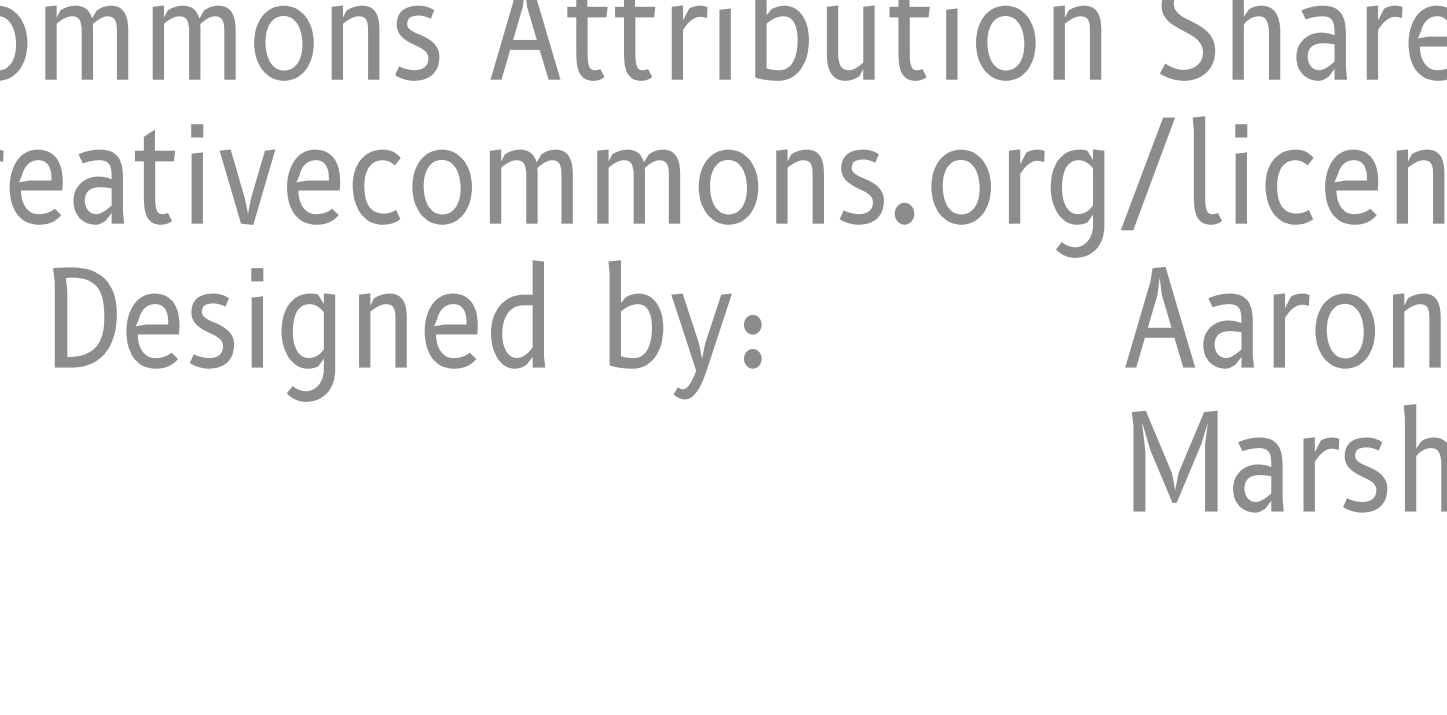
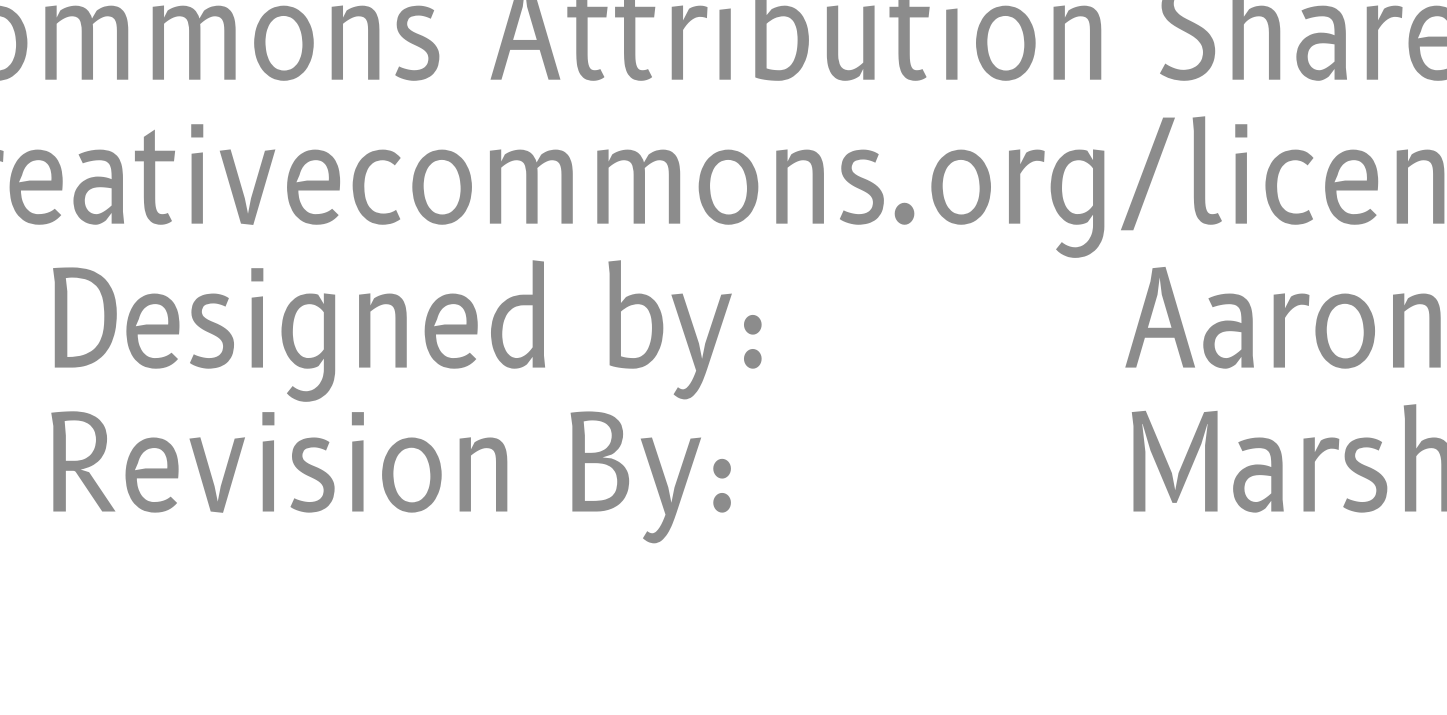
drawing: none -> [51, 411, 731, 544]

